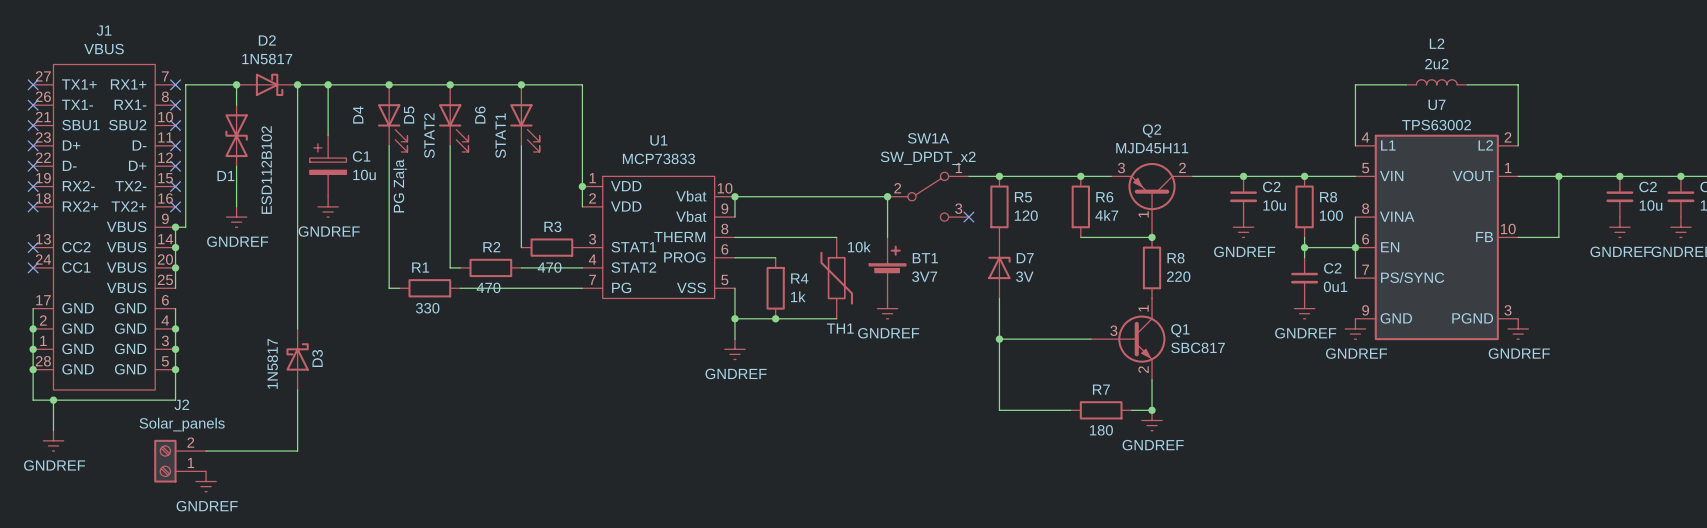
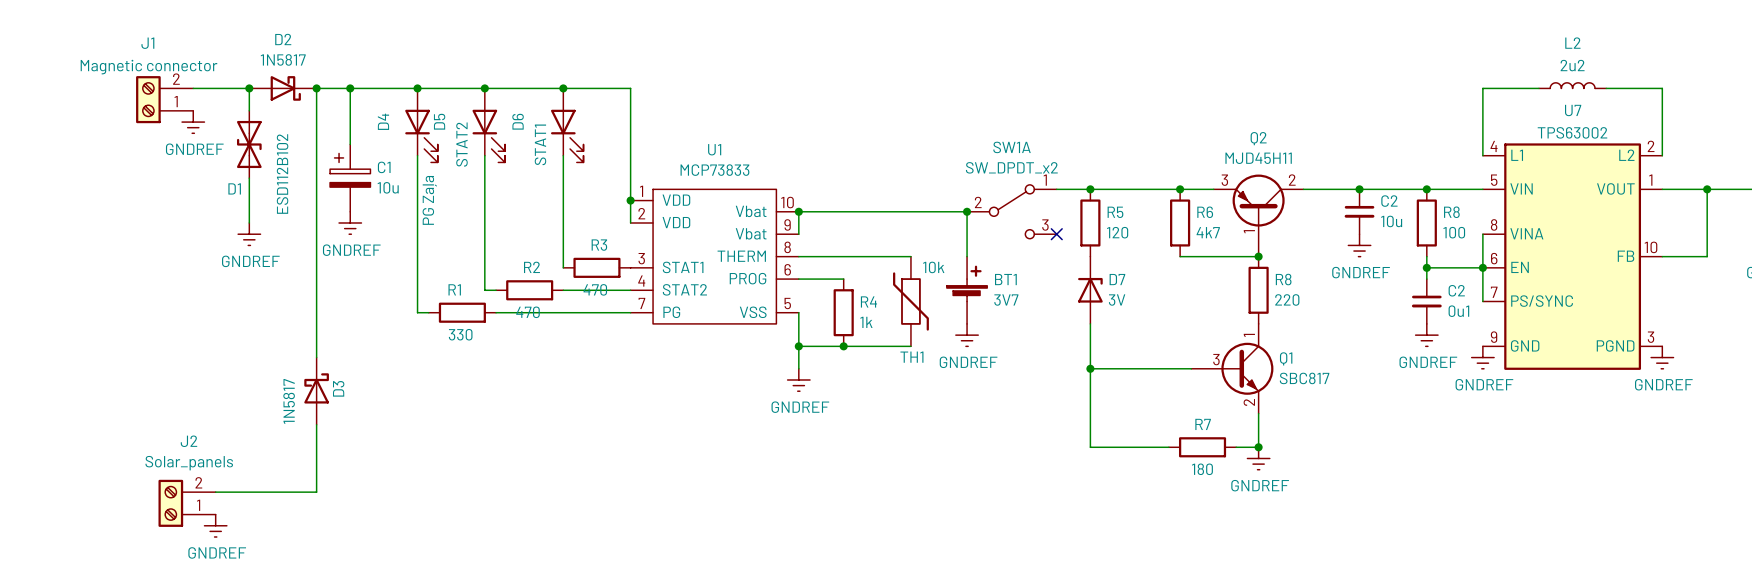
J1 name position: J1 (104, 30) -> J1 (147, 43)
J1 value: VBUS (104, 49) -> Magnetic connector (149, 67)
J1 symbol: [33, 64, 176, 390] -> [136, 76, 194, 124]
no-connect mark: (33, 84) -> none
no-connect mark: (175, 84) -> none
wire: (185, 84) (185, 227) (175, 227) (175, 288) -> none
no-connect mark: (33, 105) -> none
no-connect mark: (175, 105) -> none
power symbol: none -> GNDREF (193, 122)
no-connect mark: (33, 125) -> none
no-connect mark: (175, 125) -> none
no-connect mark: (33, 145) -> none
no-connect mark: (175, 145) -> none
no-connect mark: (33, 166) -> none
no-connect mark: (175, 166) -> none
no-connect mark: (33, 186) -> none
no-connect mark: (175, 186) -> none
no-connect mark: (33, 206) -> none
no-connect mark: (175, 206) -> none
junction: (175, 227) -> none
no-connect mark: (33, 247) -> none
junction: (175, 247) -> none
no-connect mark: (33, 267) -> none
junction: (175, 267) -> none
wire: (33, 308) (33, 400) (175, 400) (175, 308) -> none
junction: (33, 328) -> none
junction: (175, 328) -> none
junction: (33, 349) -> none
junction: (175, 349) -> none
junction: (33, 369) -> none
junction: (175, 369) -> none
wire: (53, 400) (53, 430) -> none
junction: (53, 400) -> none
power symbol: GNDREF (53, 440) -> none

